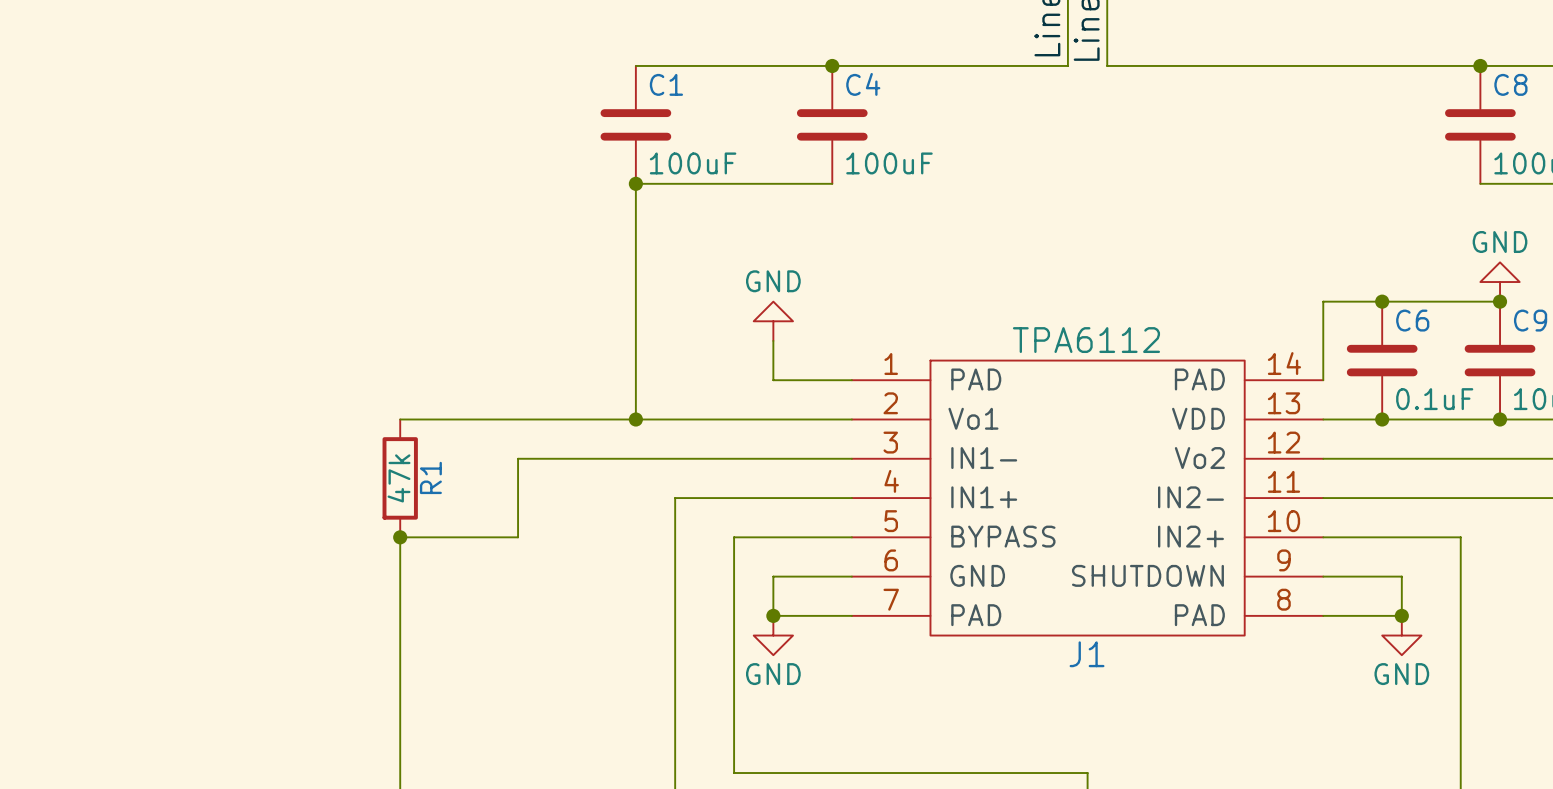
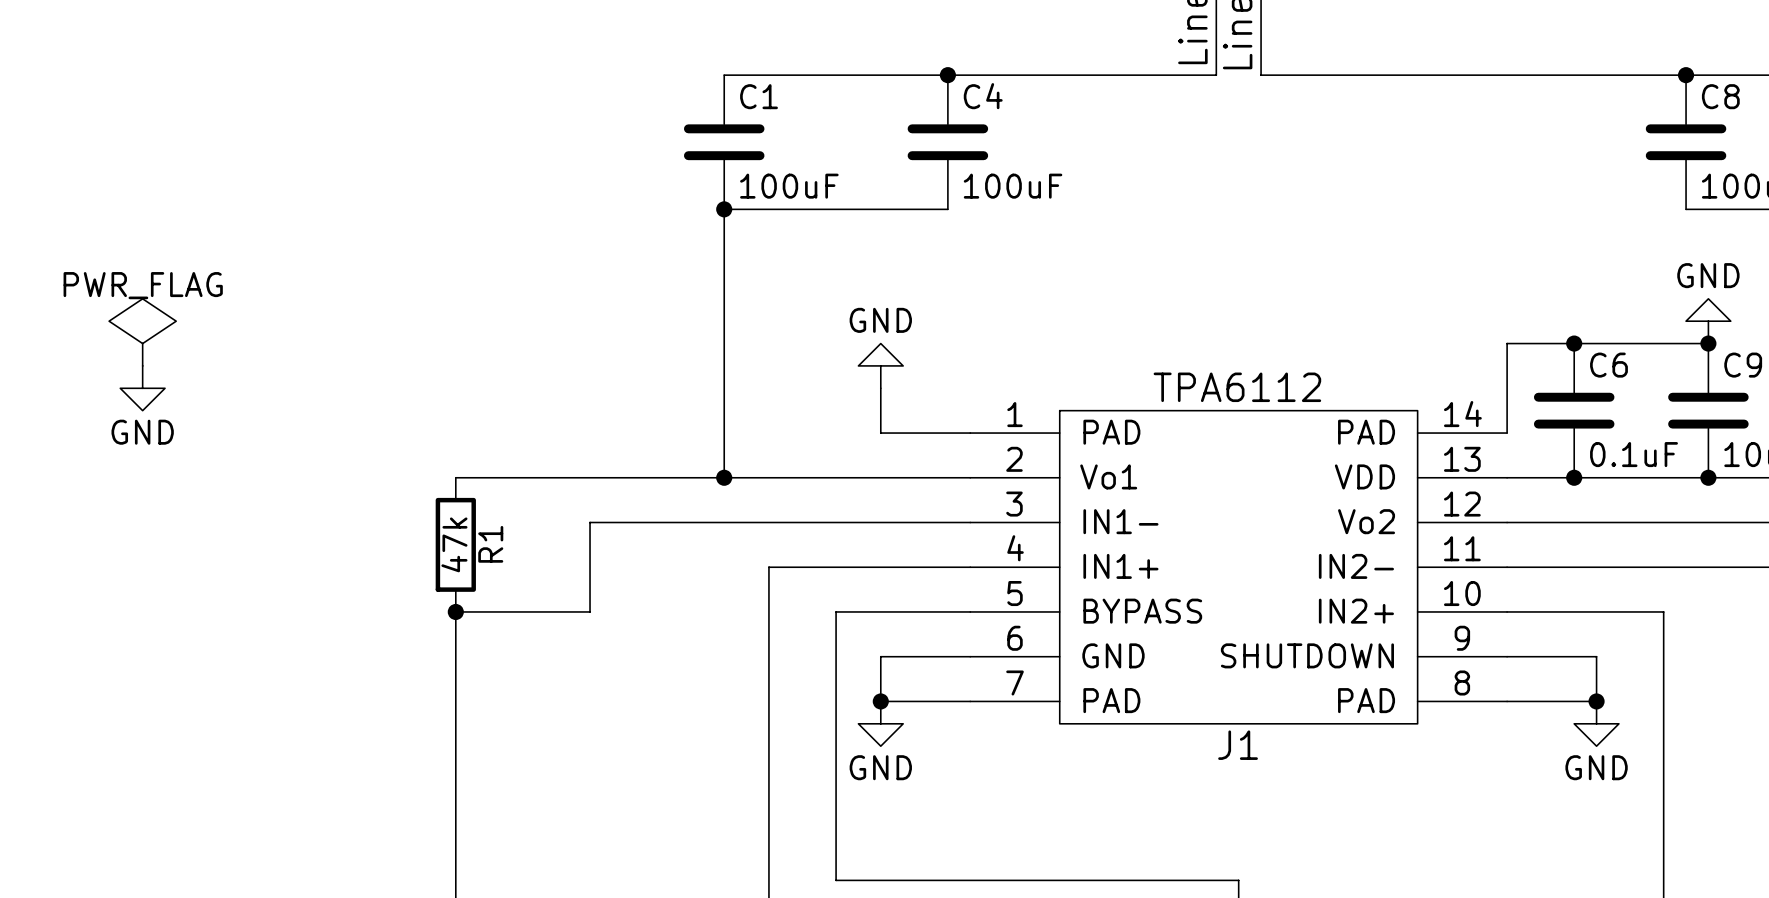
power symbol: none -> PWR_FLAG (142, 332)
power symbol: none -> GND (142, 388)

